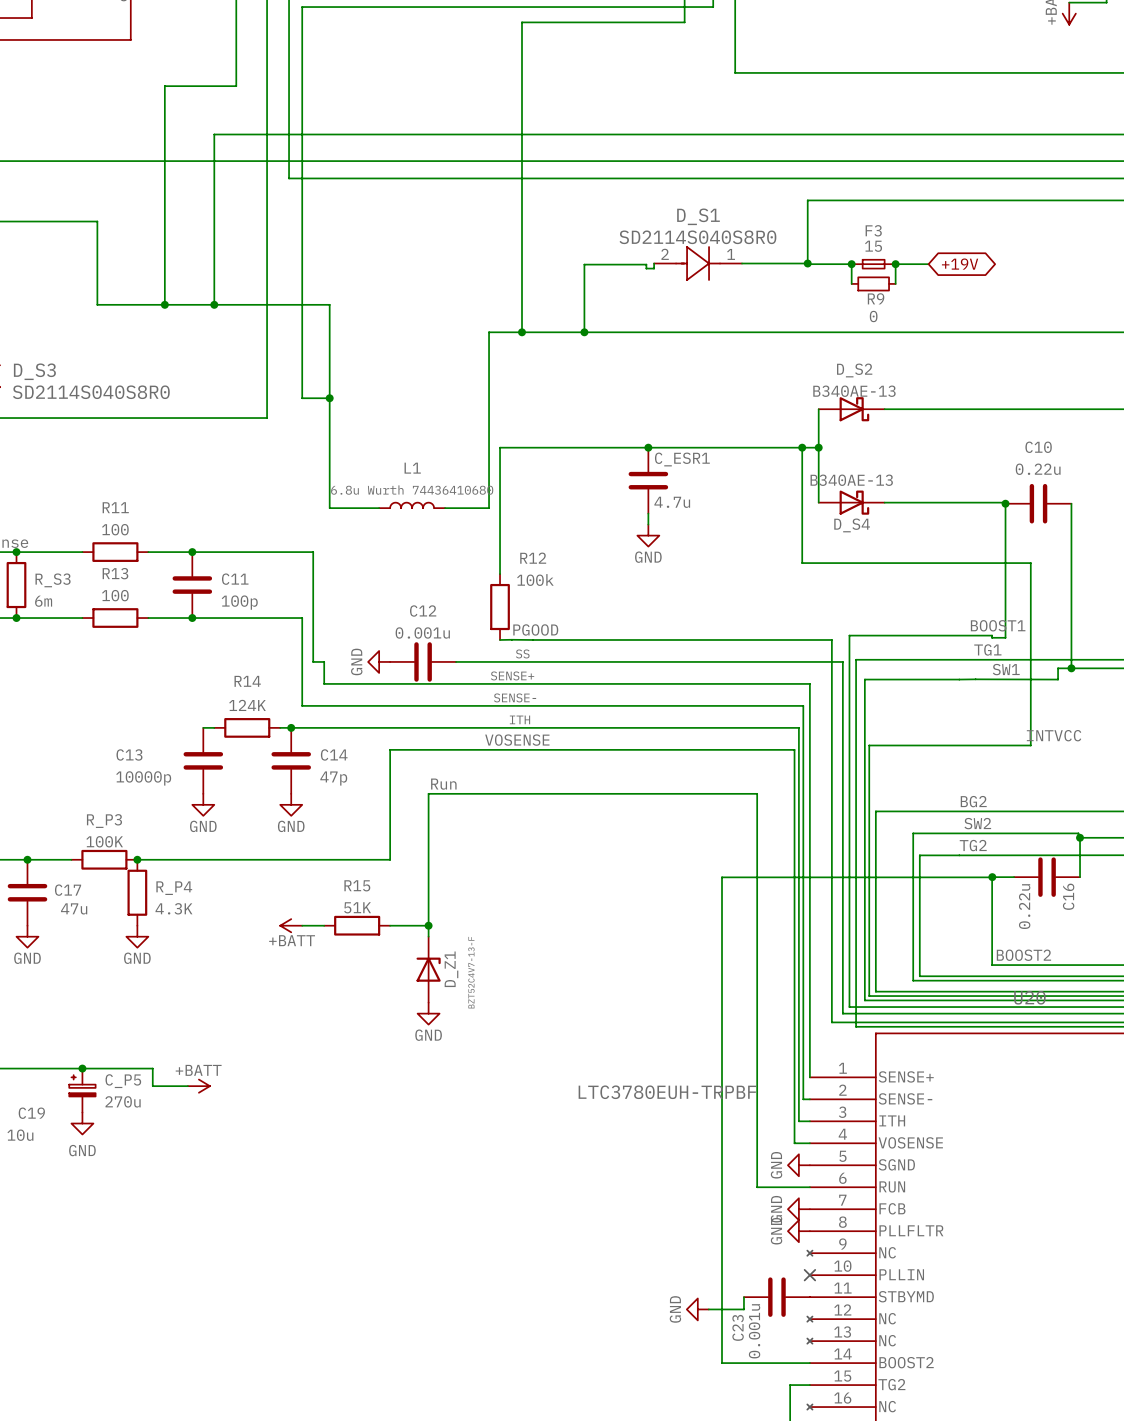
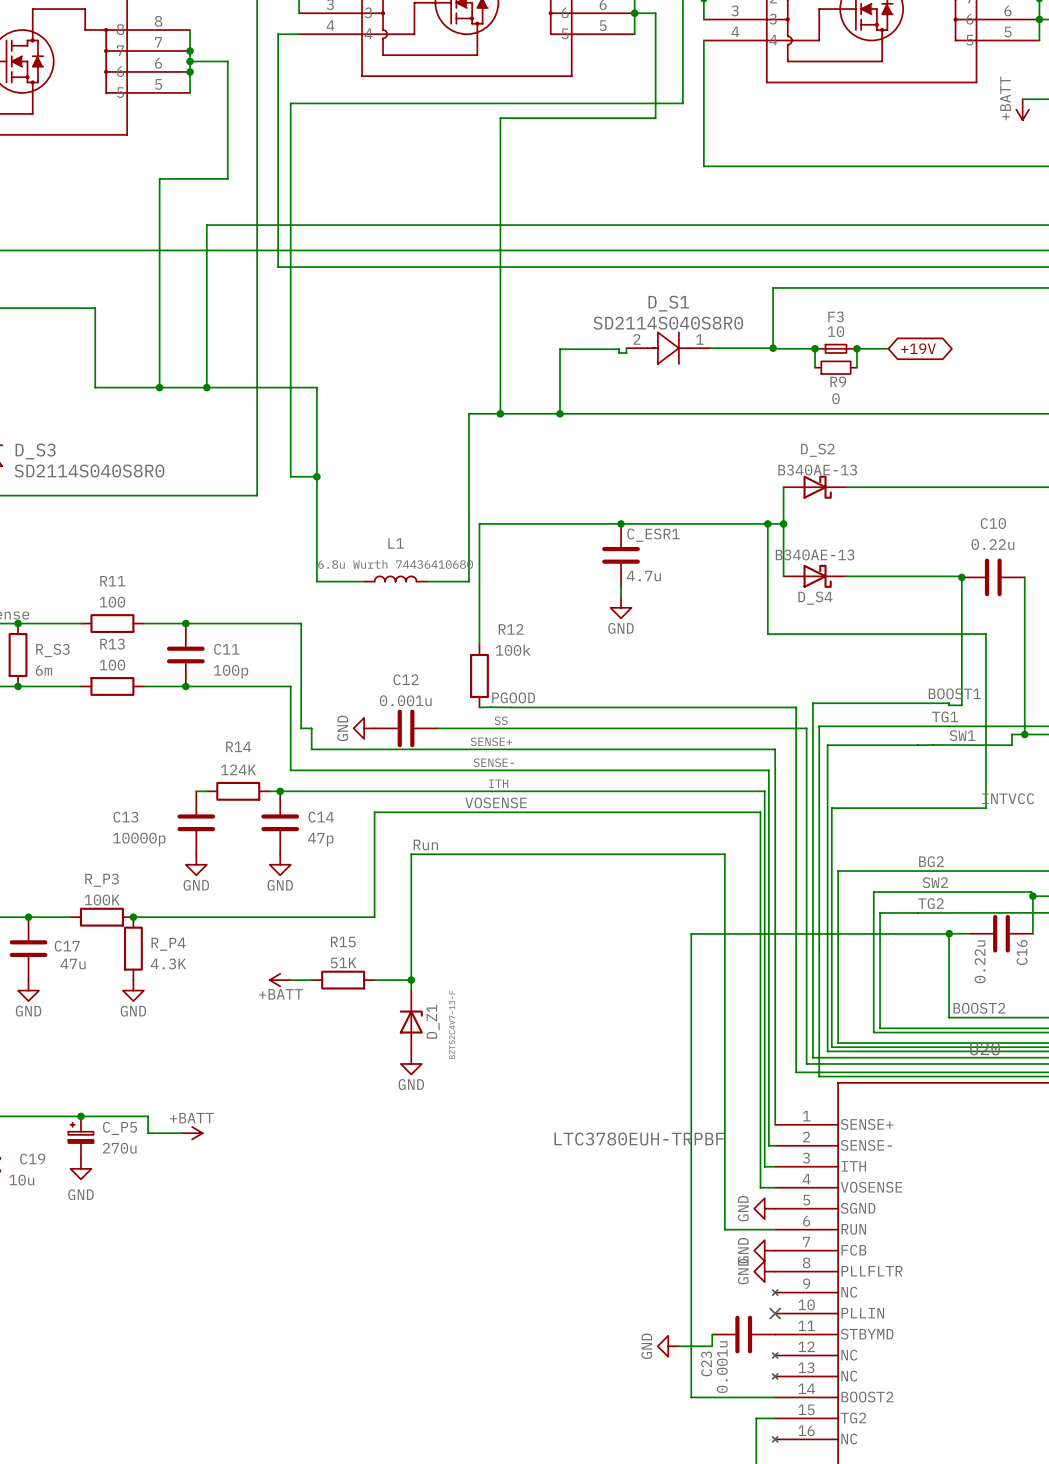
F3 value: 15 (873, 246) -> 10 (835, 331)

